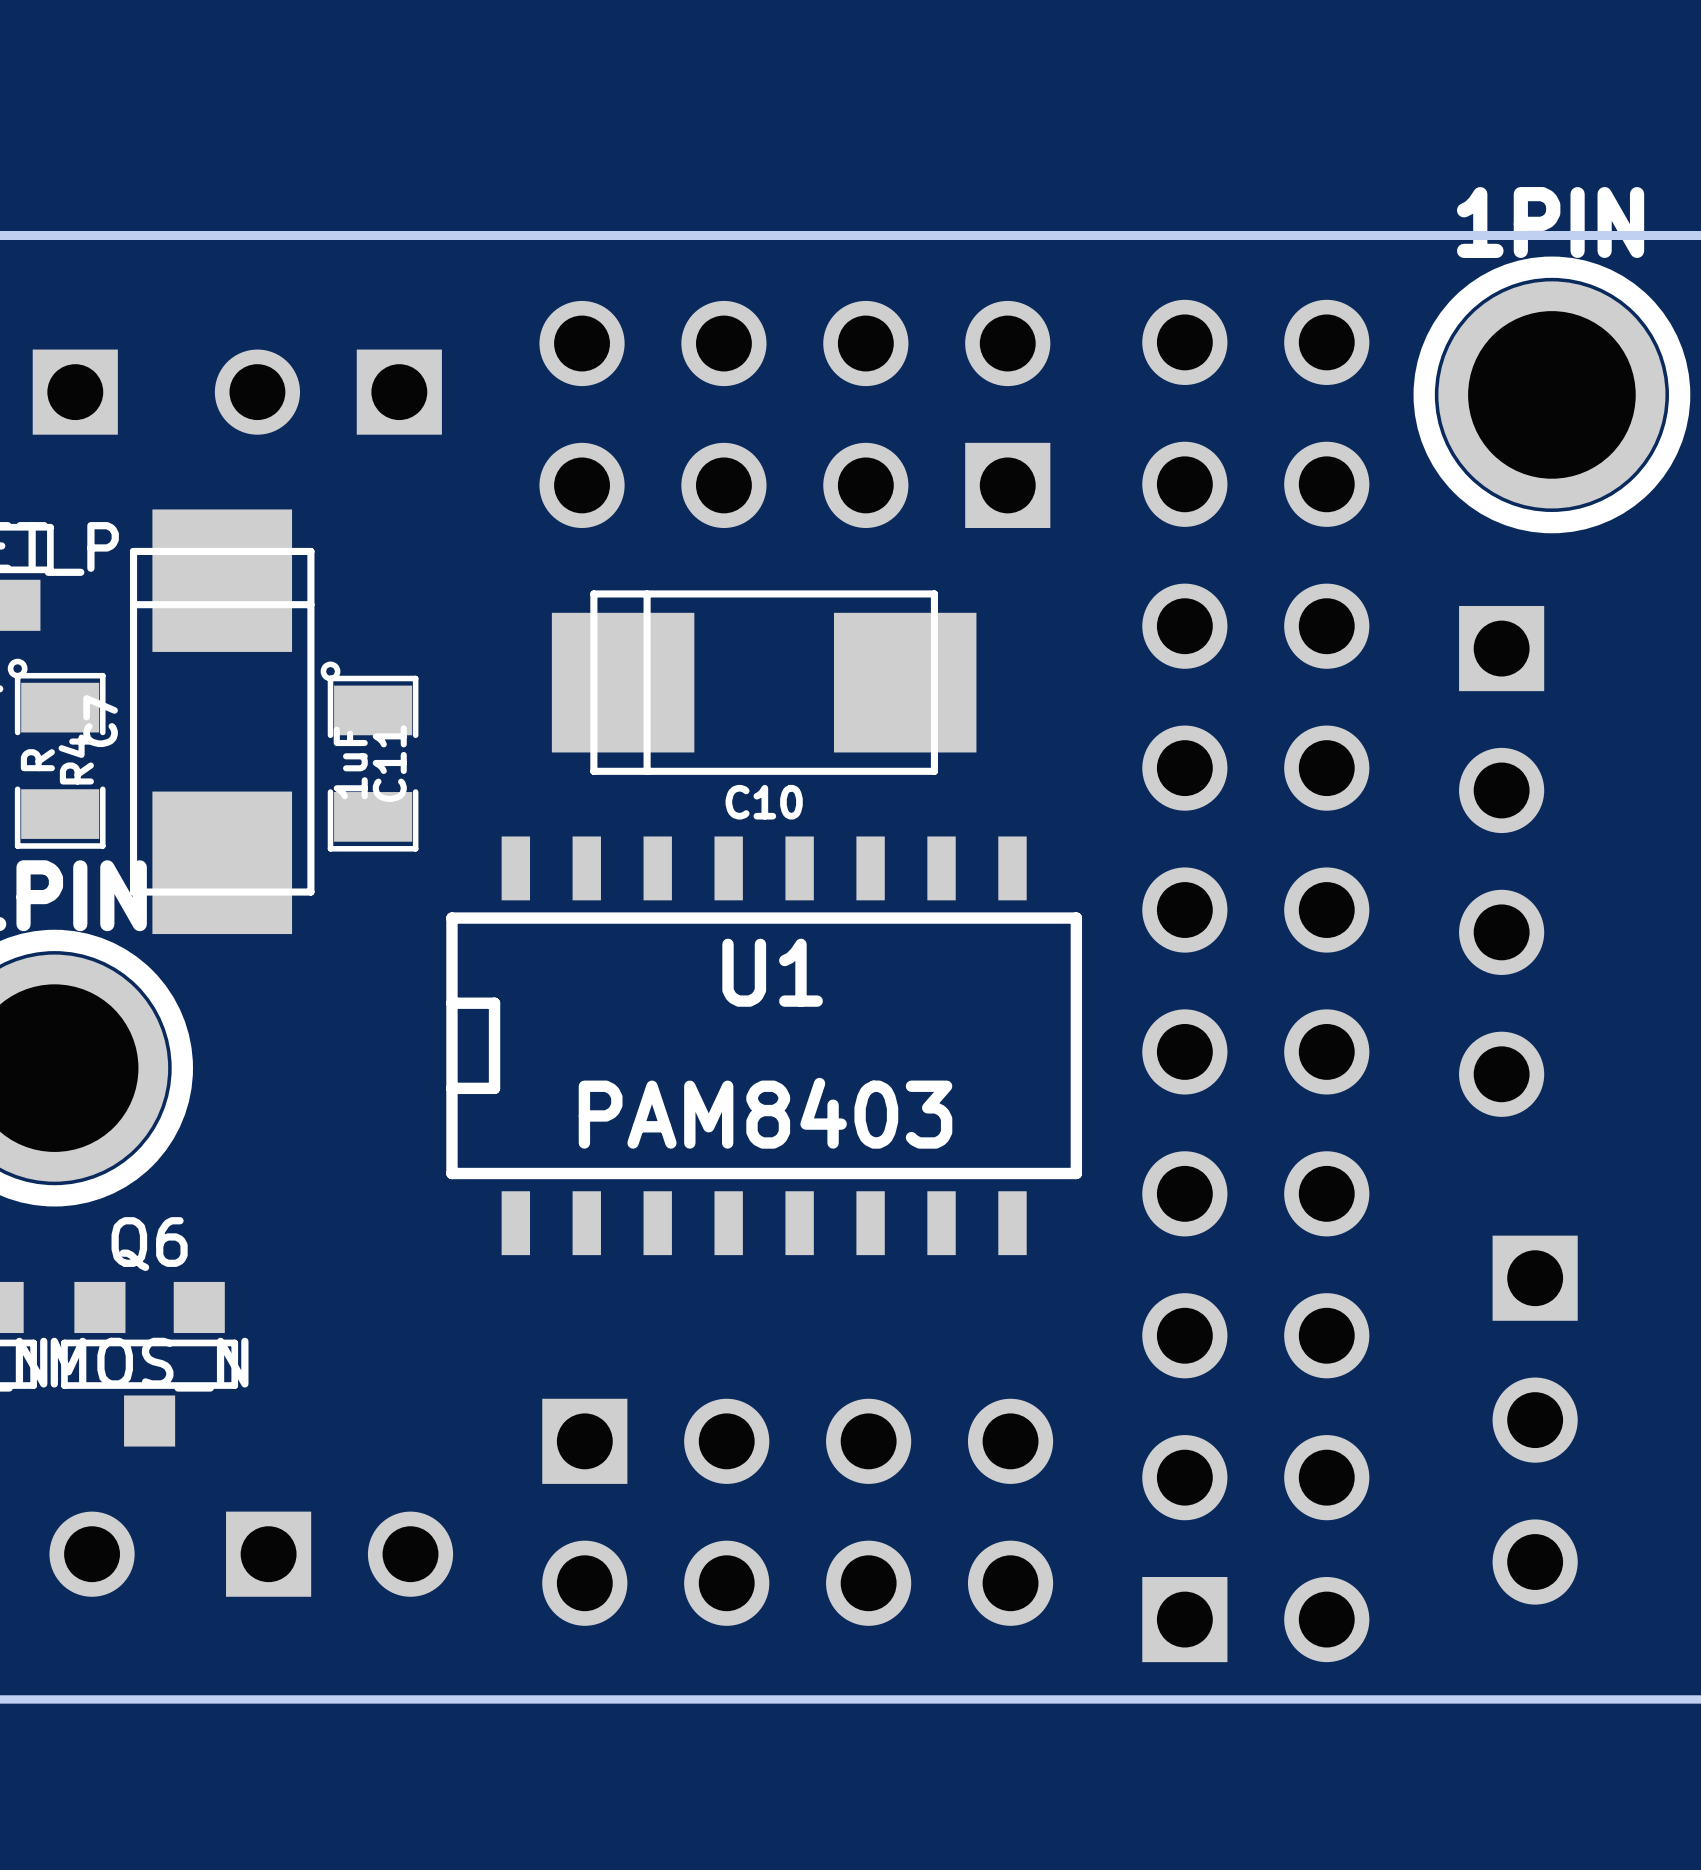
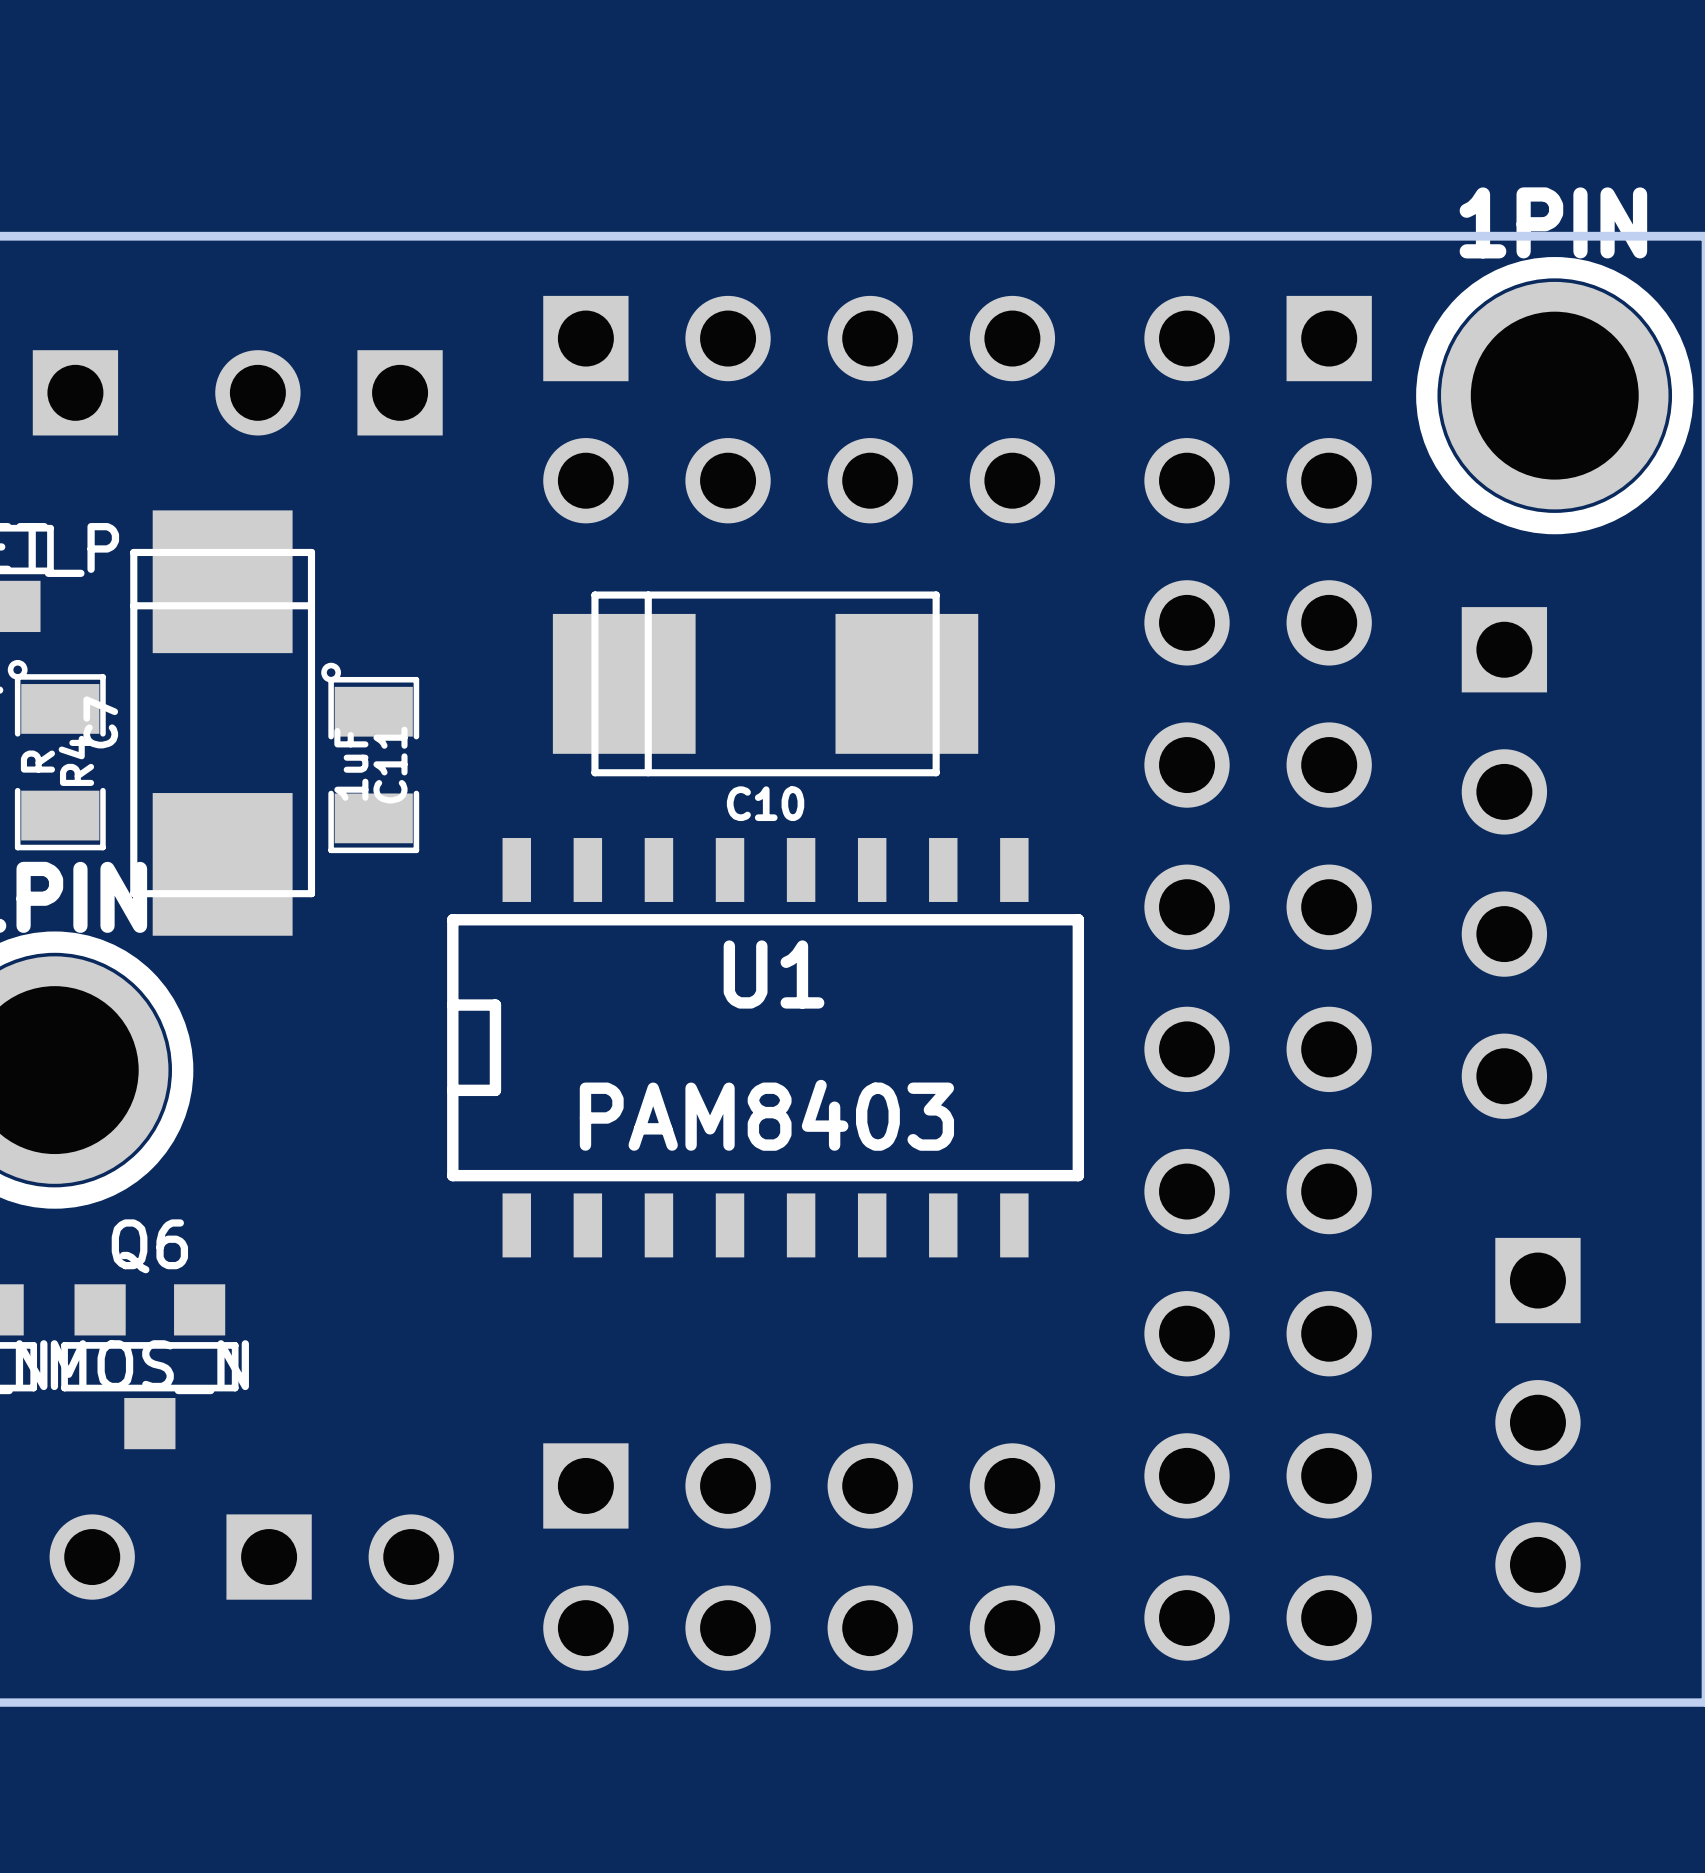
part rotation: 0° (794, 414) -> 180° (799, 409)
part rotation: 0° (1255, 980) -> 180° (1258, 978)
part position: (797, 1512) -> (799, 1557)

